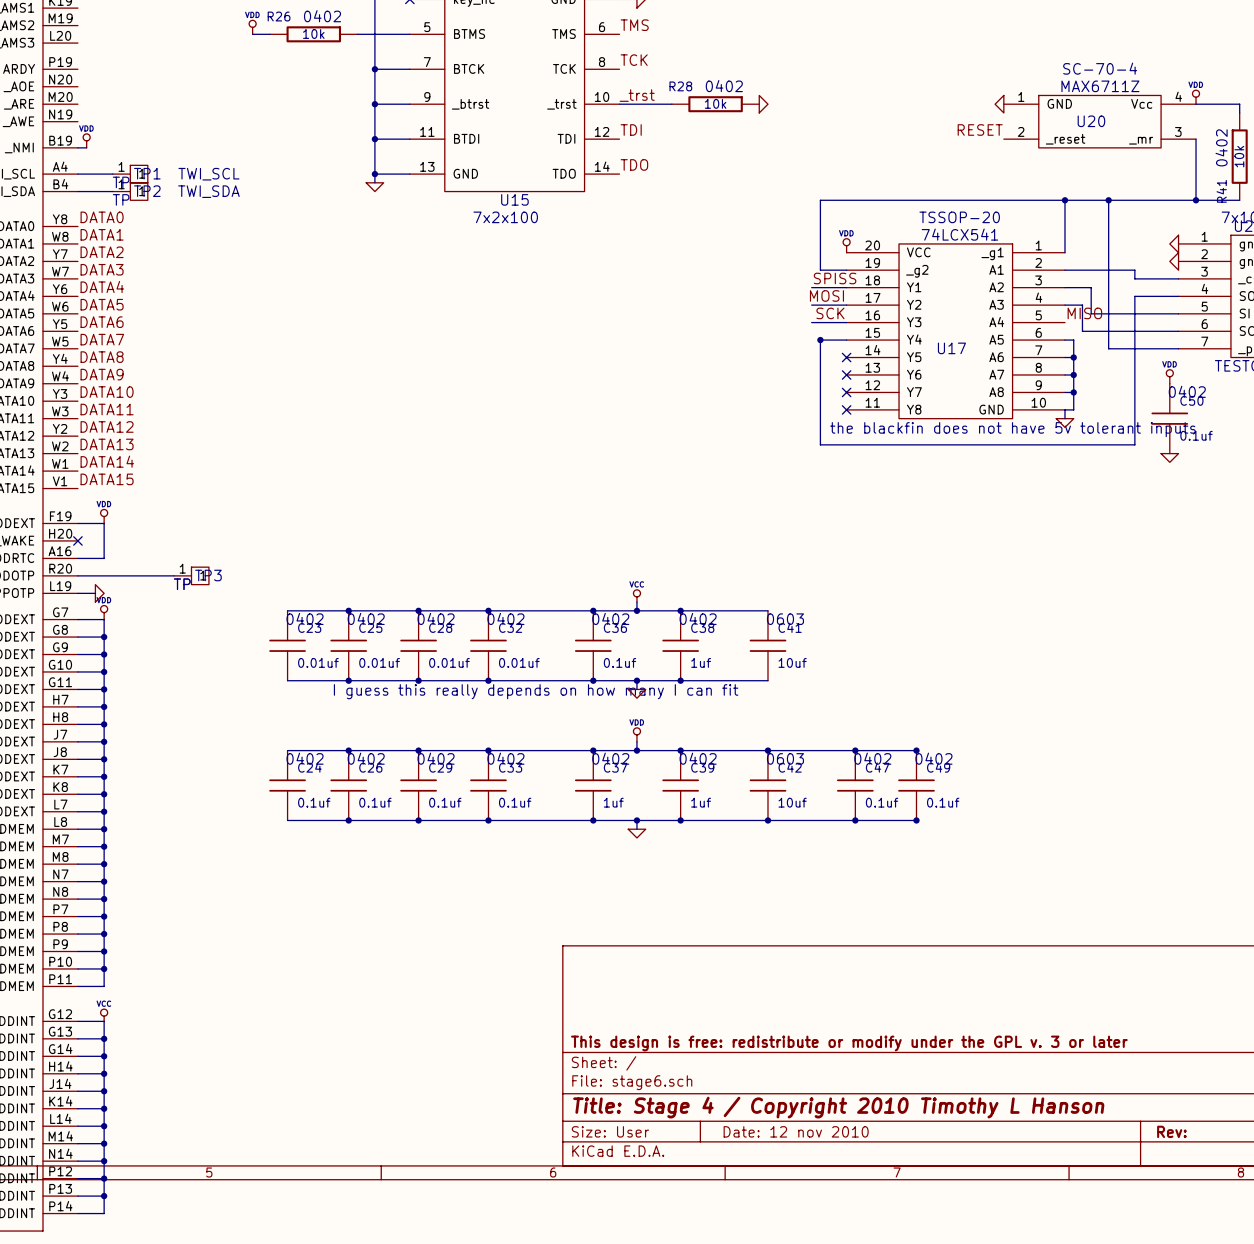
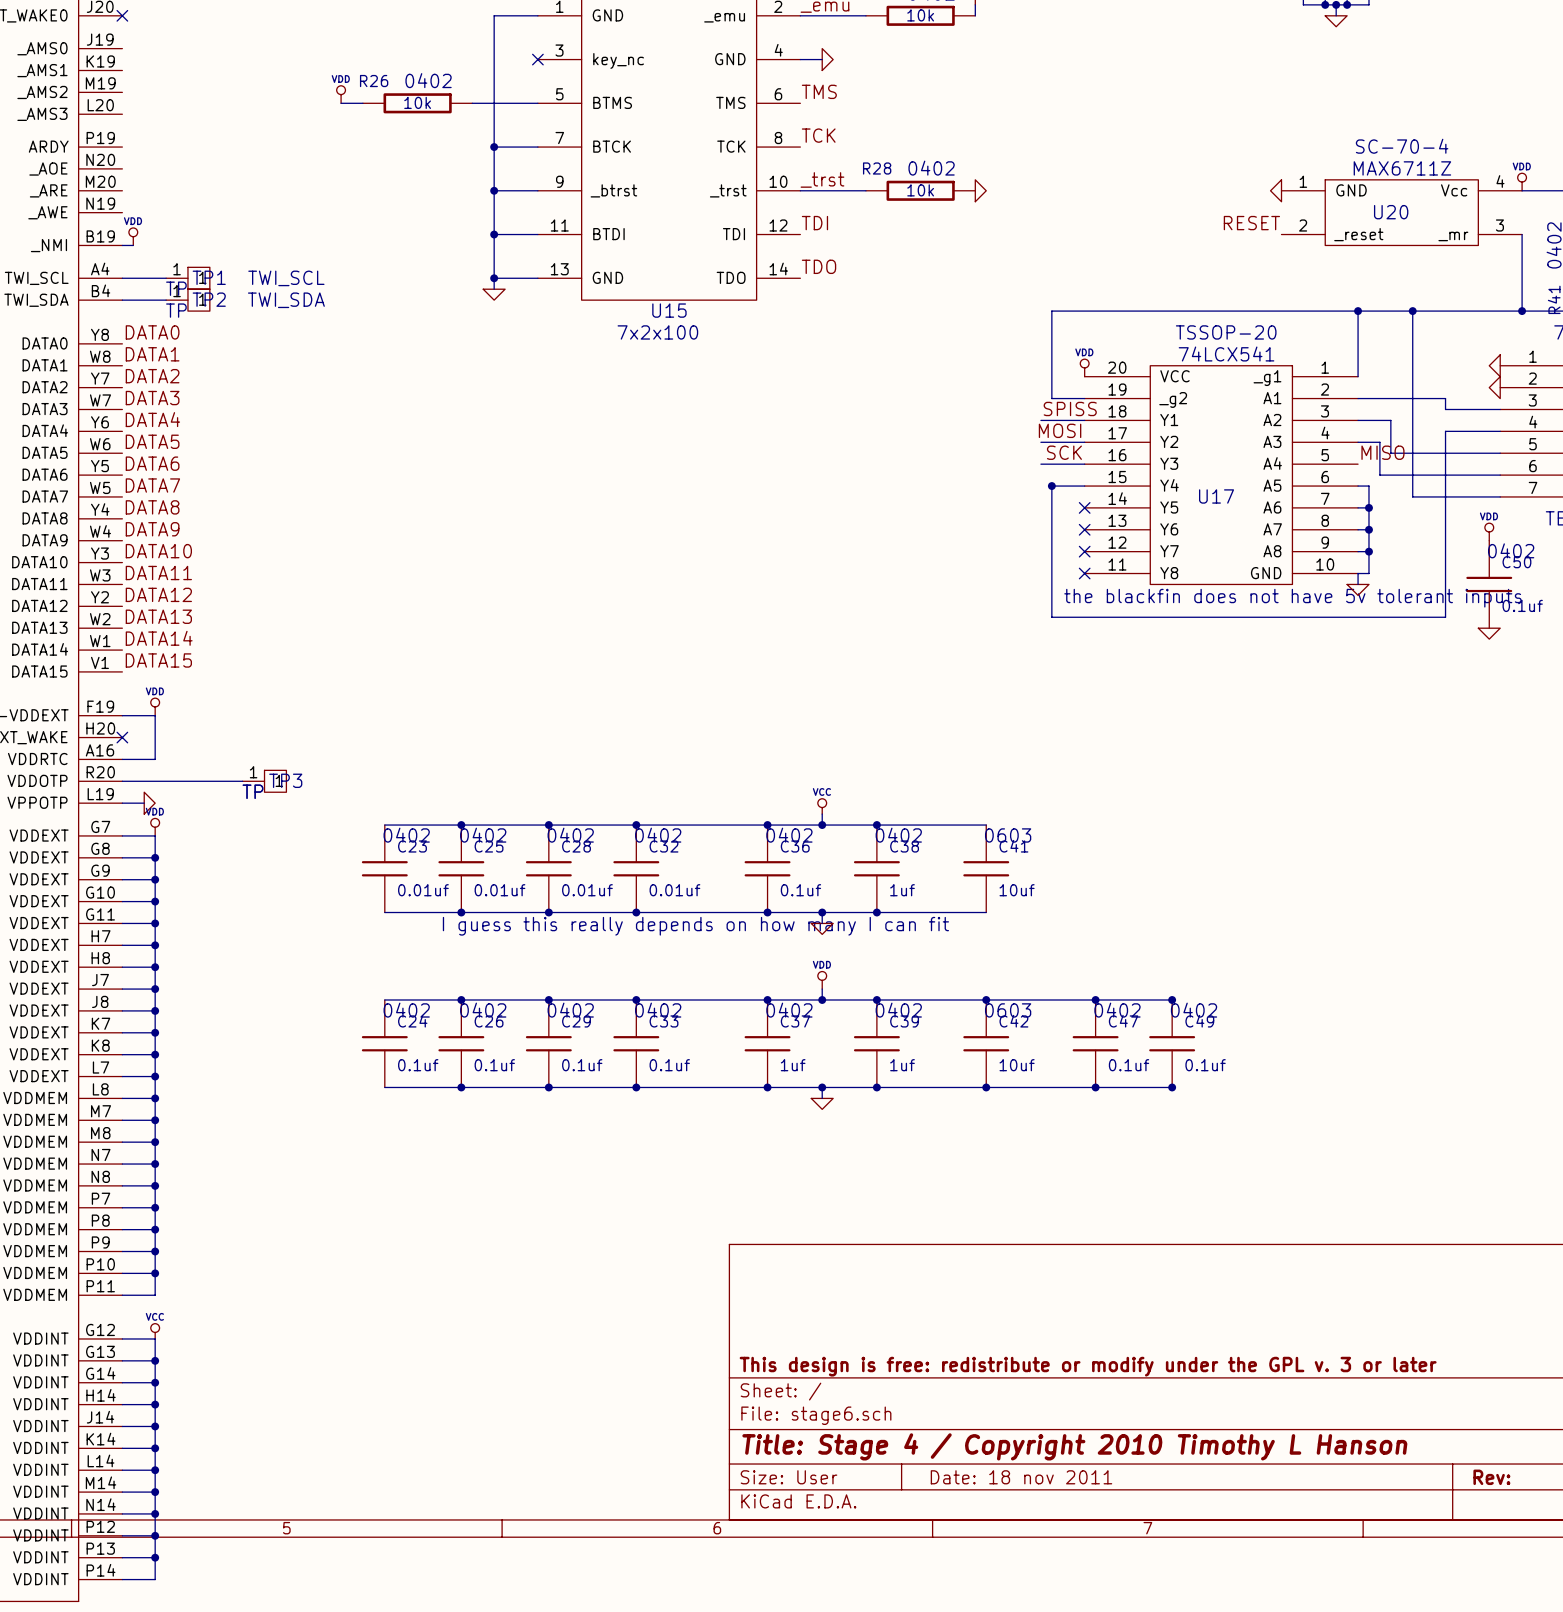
title block: Date: 12 nov 2010 (796, 1131) -> Date: 18 nov 2011 (1021, 1477)

